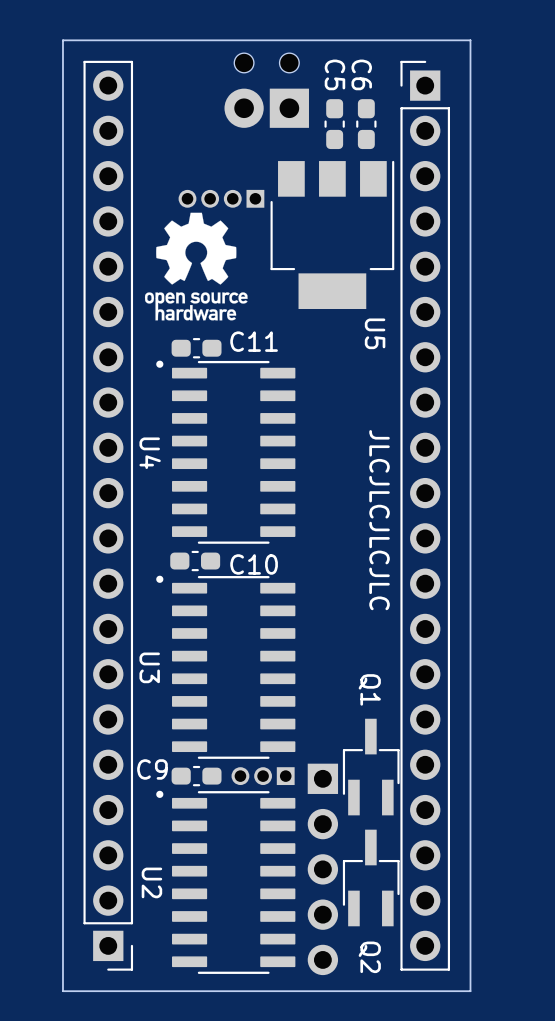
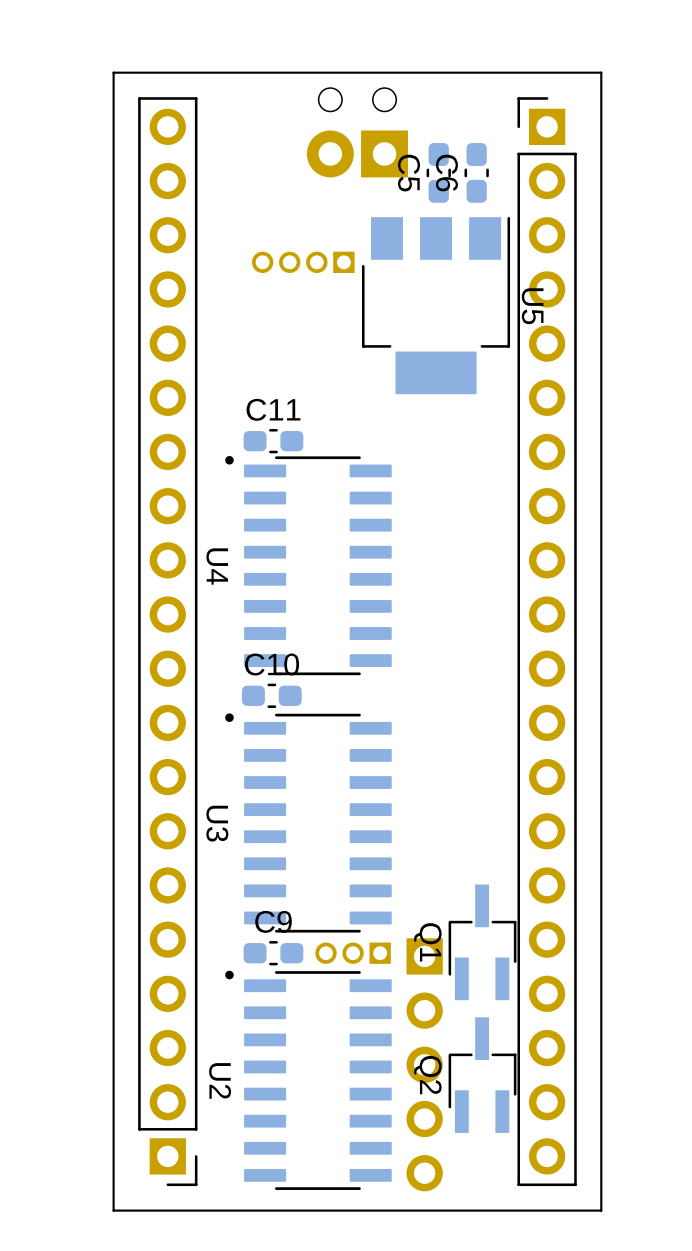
C5 name position: C5 (334, 74) -> C5 (409, 173)
C6 name position: C6 (361, 74) -> C6 (446, 173)
drawing: [144, 212, 248, 321] -> none
U5 name position: U5 (375, 333) -> U5 (532, 306)
C11 name position: C11 (254, 341) -> C11 (273, 409)
text: JLCJLCJLCJLC (379, 520) -> none
C10 name position: C10 (254, 564) -> C10 (272, 664)
Q1 name position: Q1 (369, 689) -> Q1 (427, 942)
C9 name position: C9 (152, 769) -> C9 (273, 921)
Q2 name position: Q2 (369, 957) -> Q2 (427, 1075)

